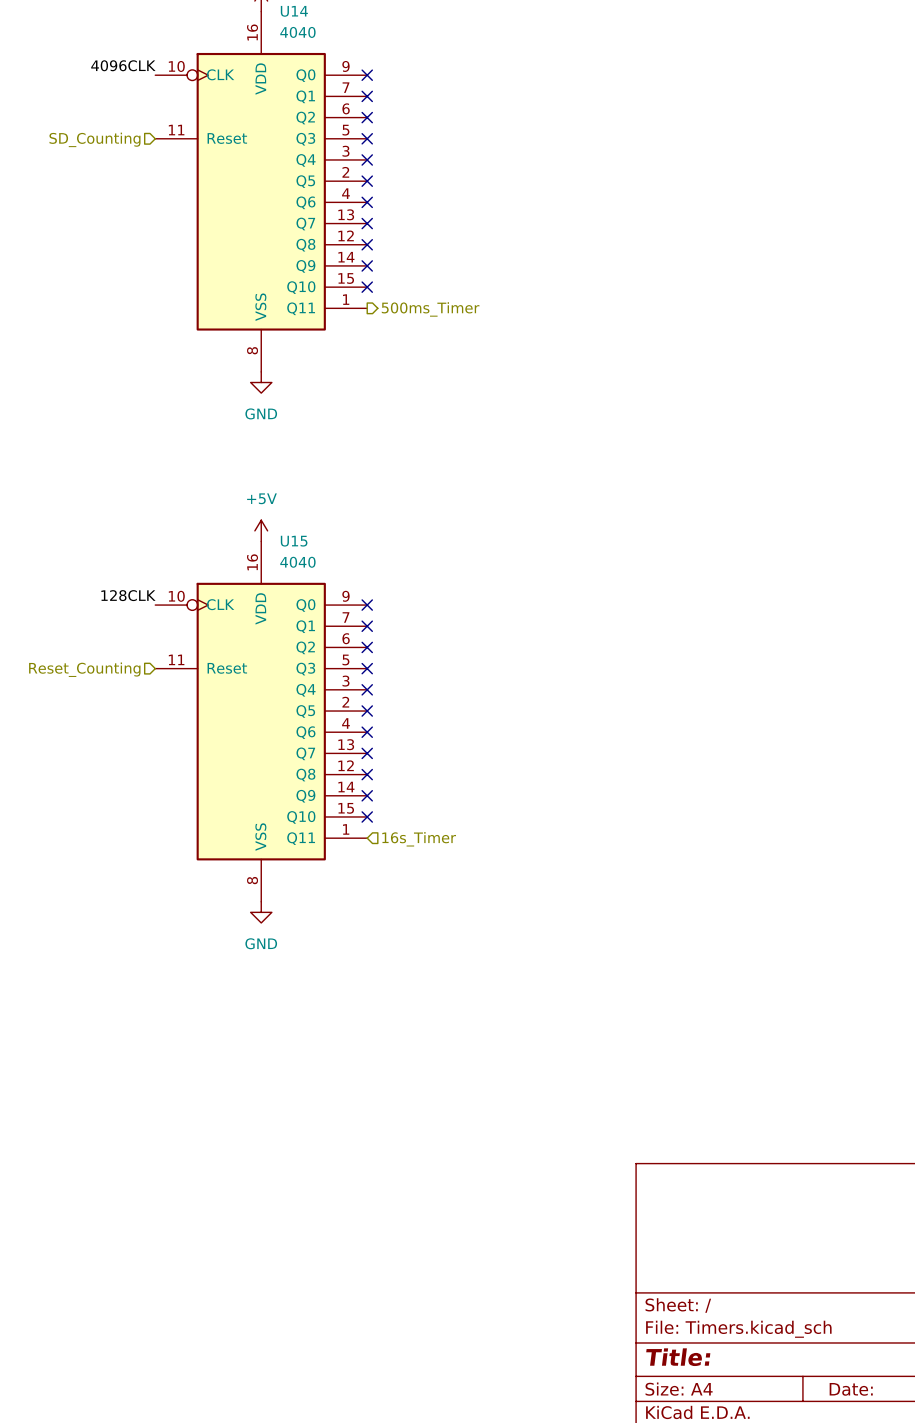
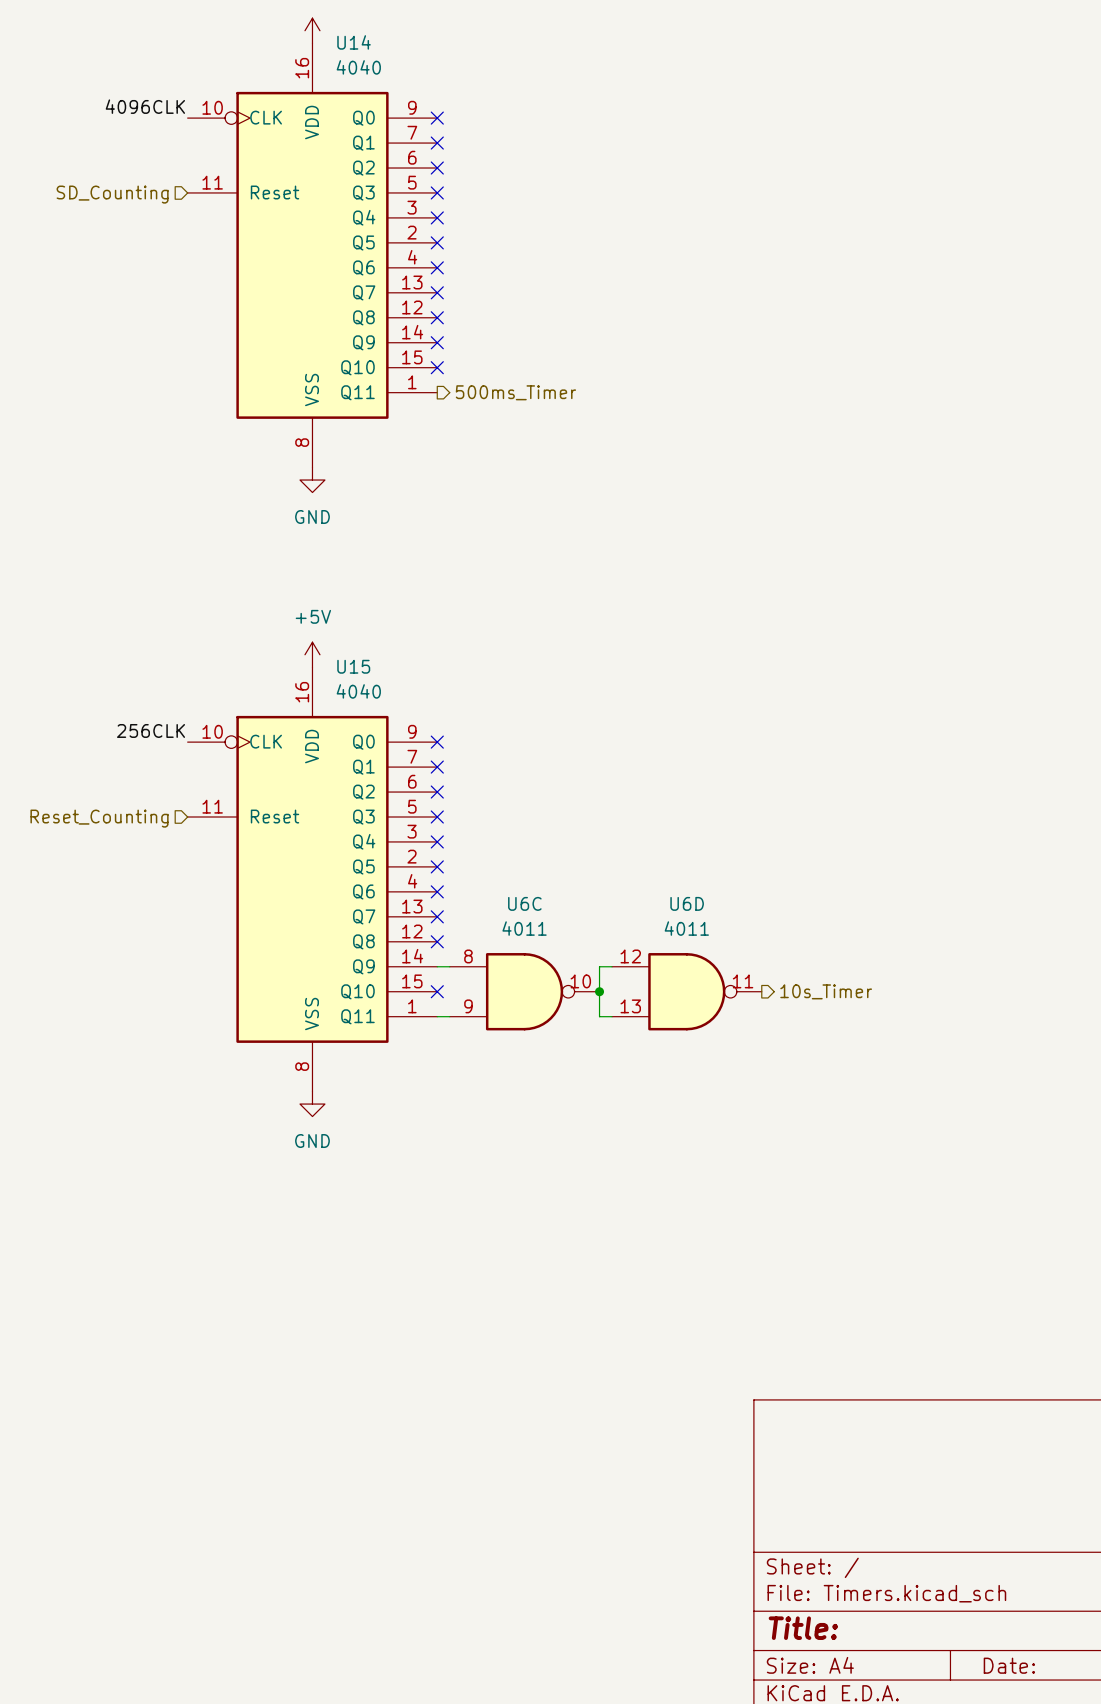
label: 128CLK (128, 595) -> 256CLK (151, 730)
wire: none -> (437, 966) (449, 966)
no-connect mark: (367, 795) -> none
wire: none -> (612, 966) (599, 966) (599, 1016) (612, 1016)
U6C: none -> 4011 (524, 991)
junction: none -> (599, 991)
U6D: none -> 4011 (686, 991)
hierarchical label: none -> 10s_Timer (826, 991)
wire: none -> (437, 1016) (449, 1016)
hierarchical label: 16s_Timer (419, 839) -> none

